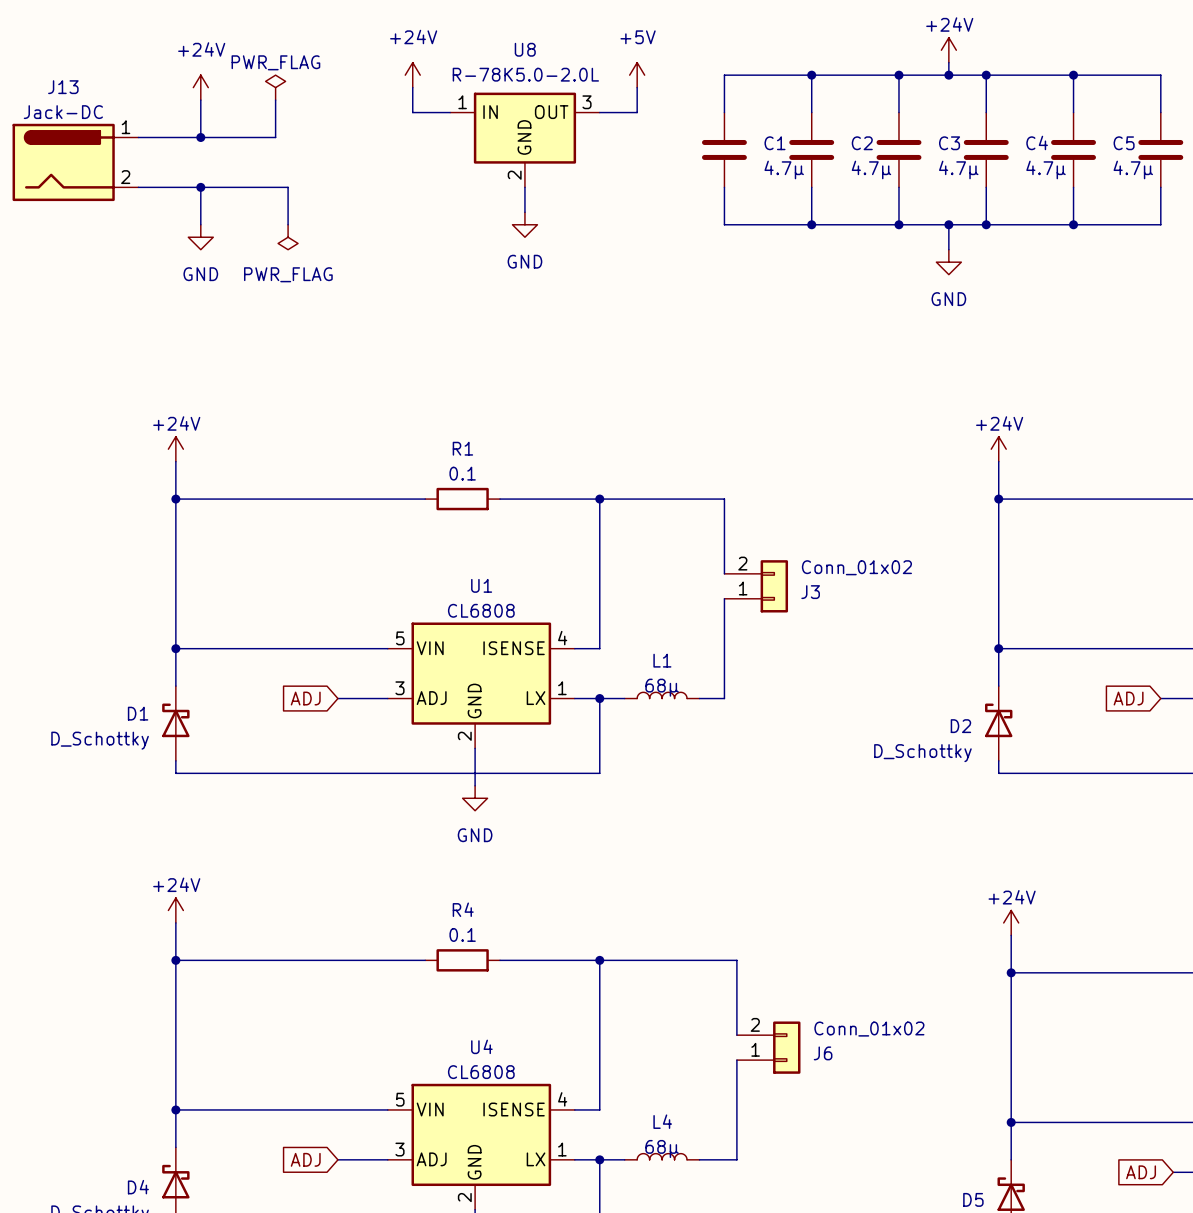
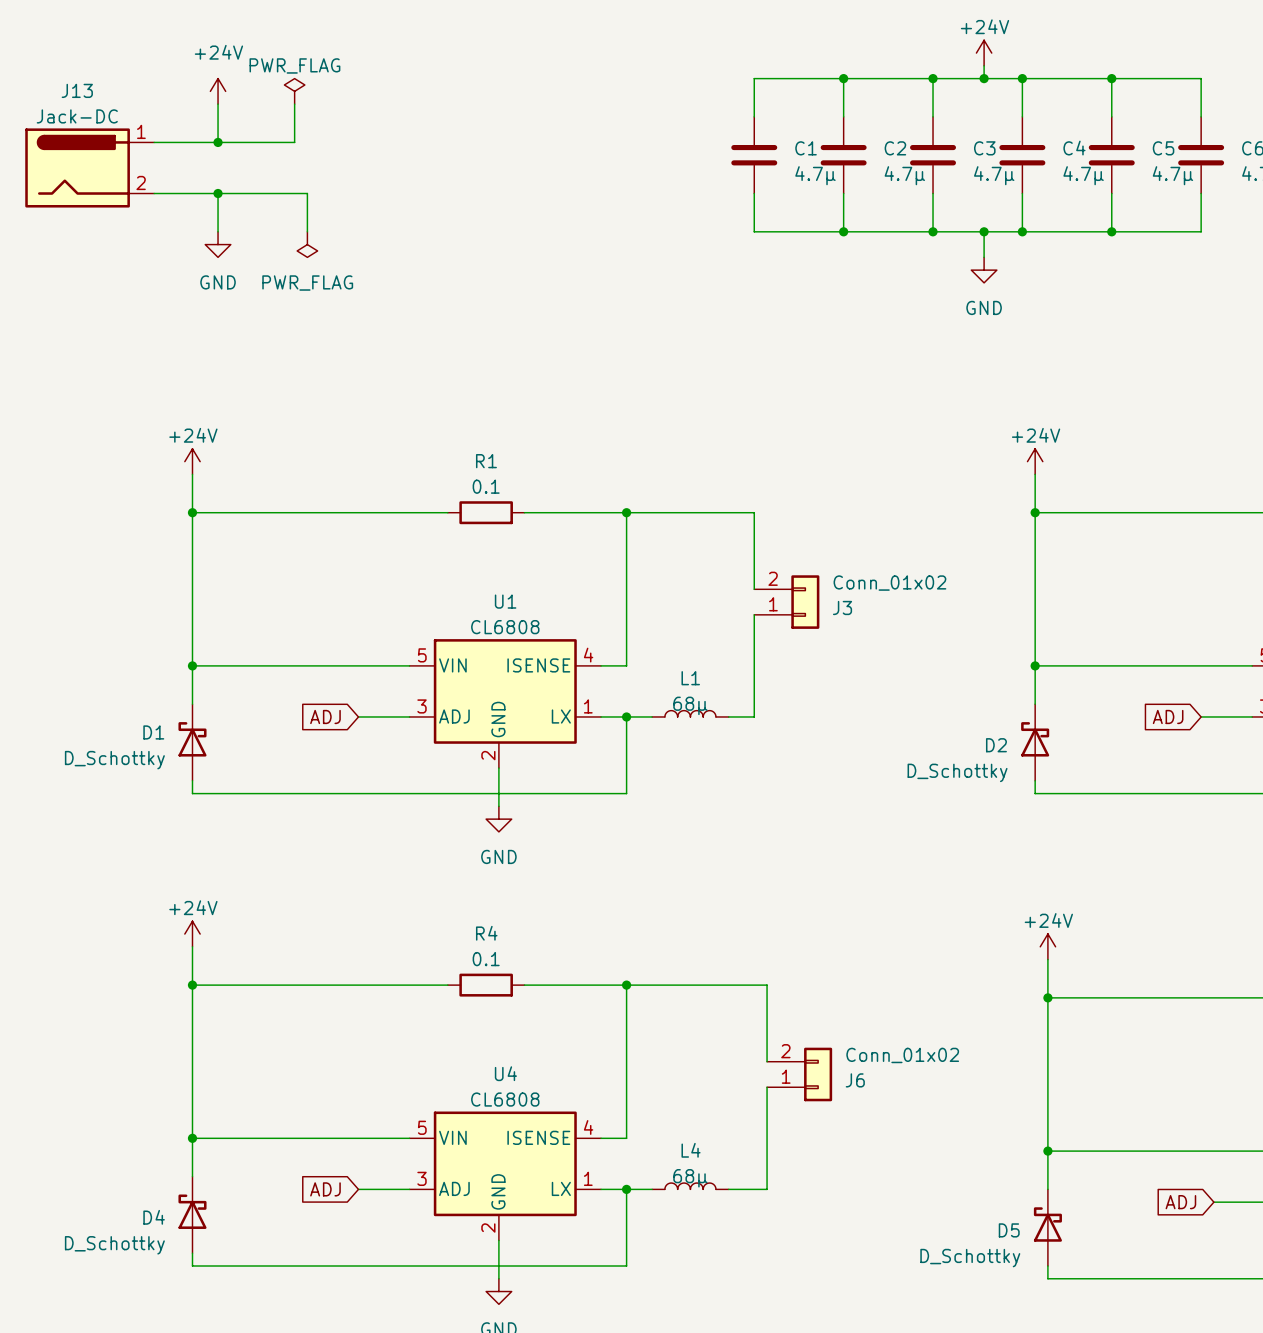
power symbol: +24V (412, 75) -> none
power symbol: +5V (637, 75) -> none
wire: (412, 87) (412, 112) (450, 112) -> none
wire: (637, 87) (637, 112) (599, 112) -> none
U8: R-78K5.0-2.0L (524, 139) -> none
wire: (524, 187) (524, 212) -> none
power symbol: GND (524, 224) -> none

